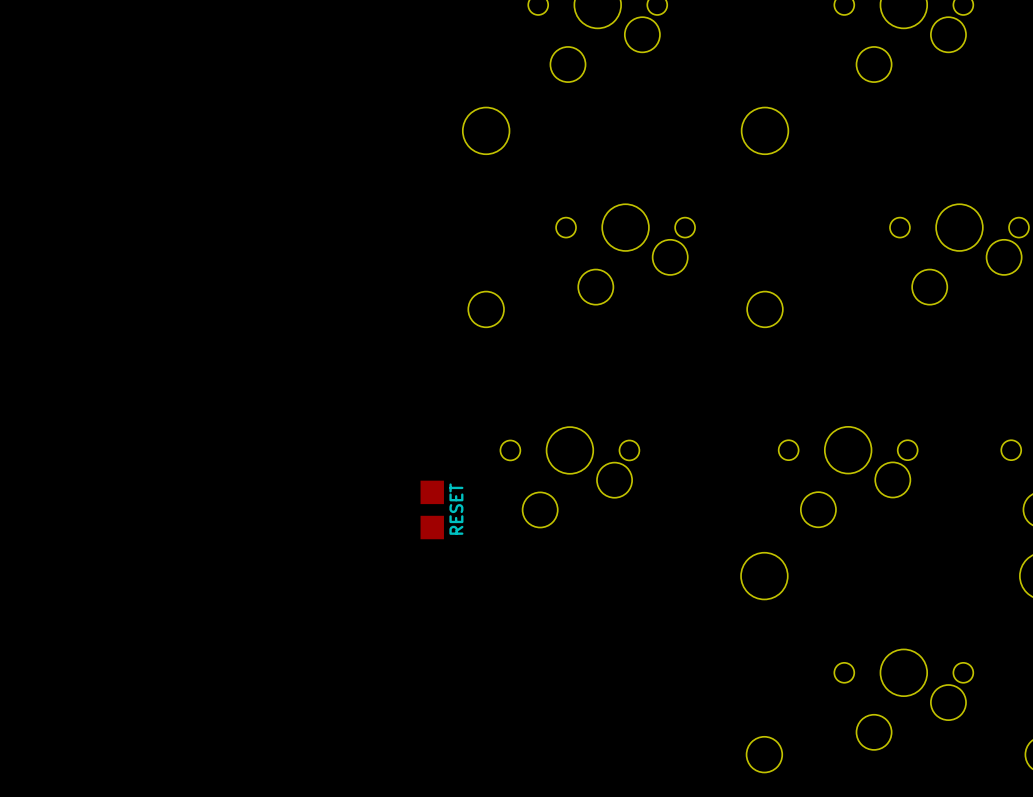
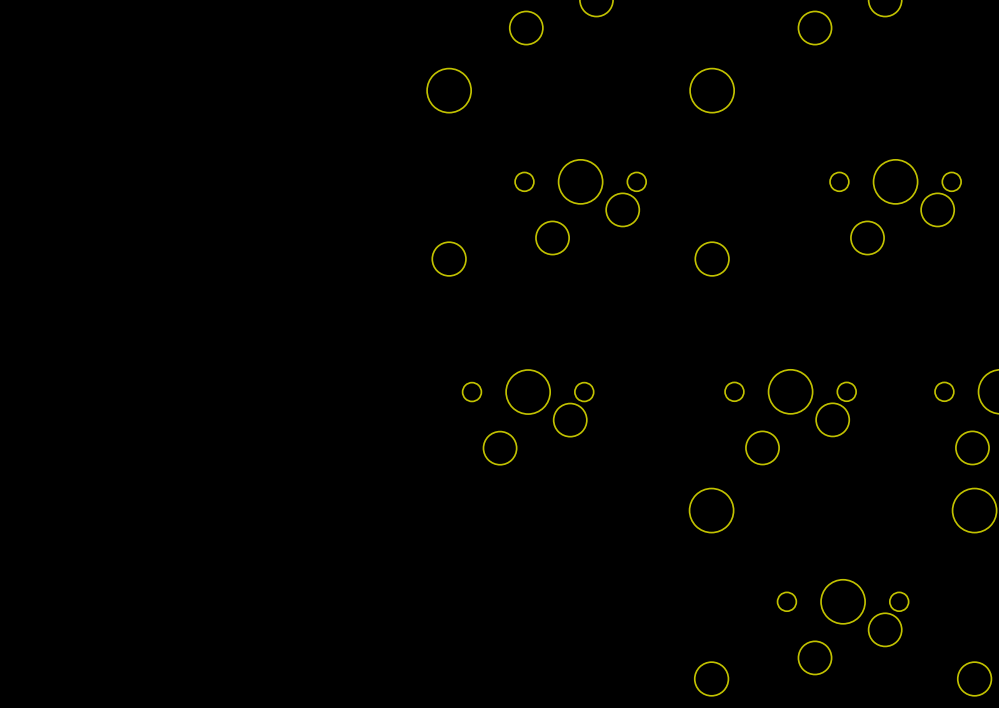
part: (432, 509) -> none
text: RESET (456, 509) -> none

